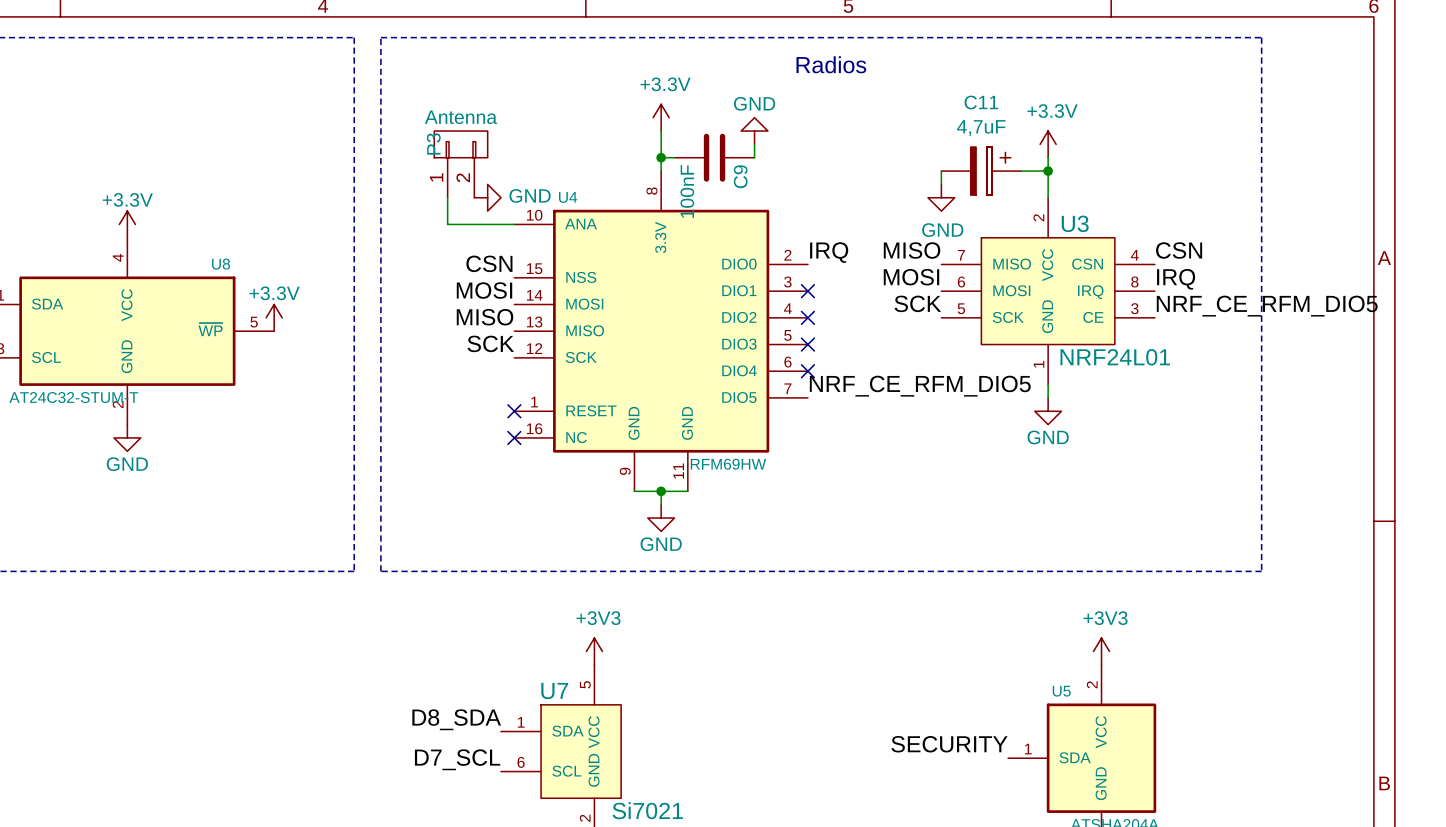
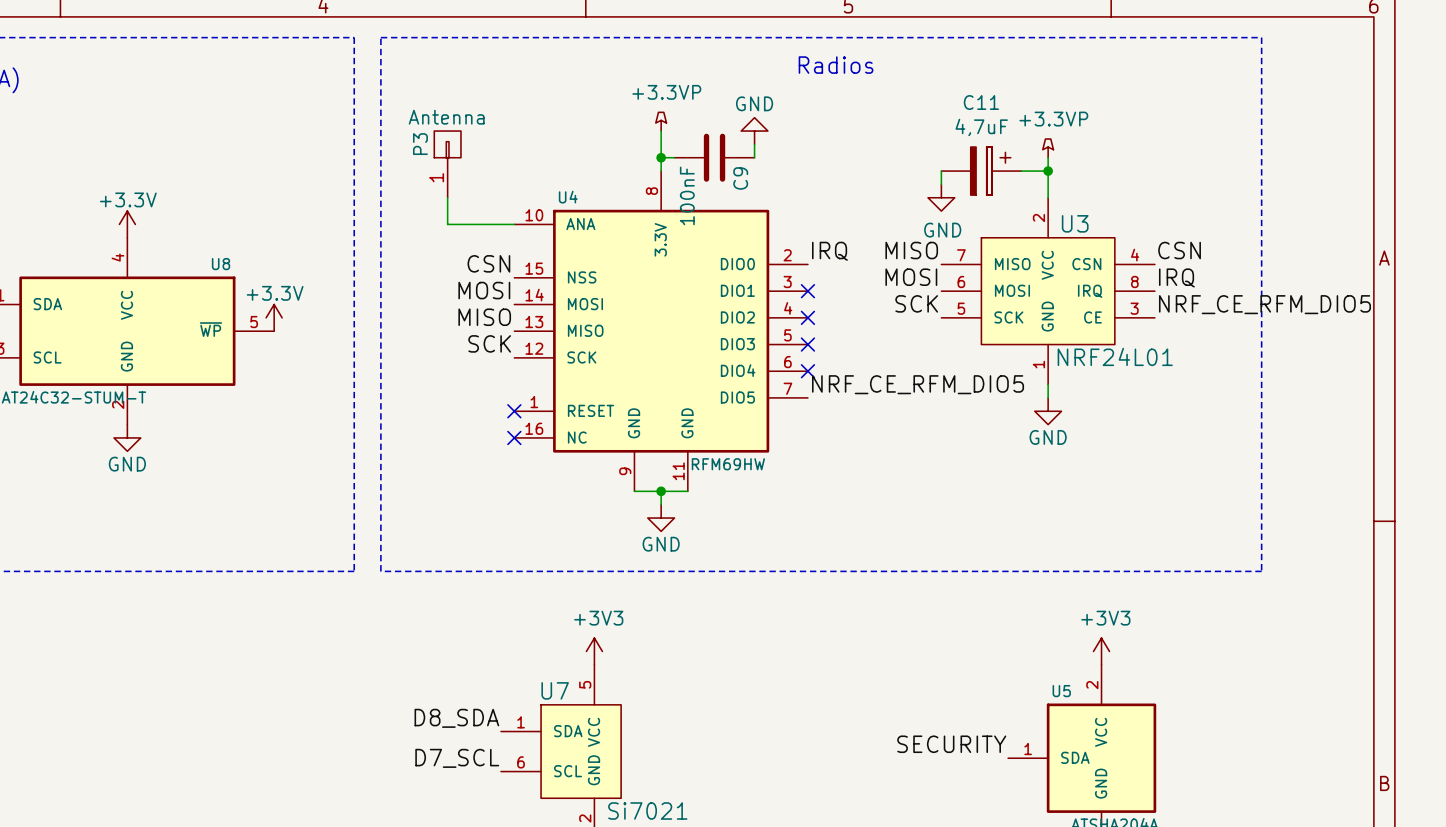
power symbol: +3.3V (661, 117) -> +3.3VP (661, 121)
P3 symbol: [434, 131, 488, 198] -> [434, 131, 461, 198]
power symbol: +3.3V (1048, 144) -> +3.3VP (1048, 148)
power symbol: GND (487, 197) -> none

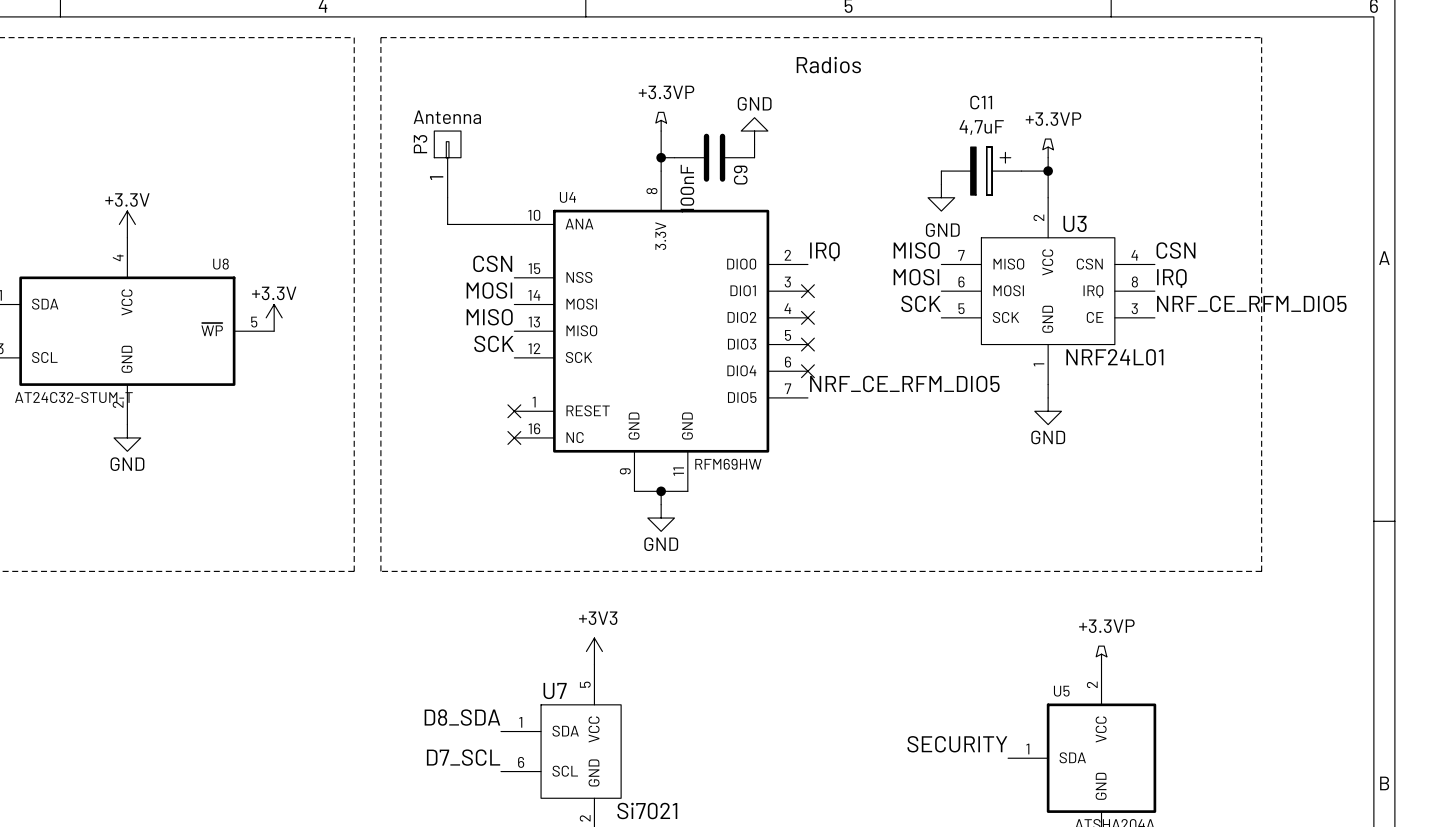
power symbol: +3V3 (1101, 651) -> +3.3VP (1101, 655)

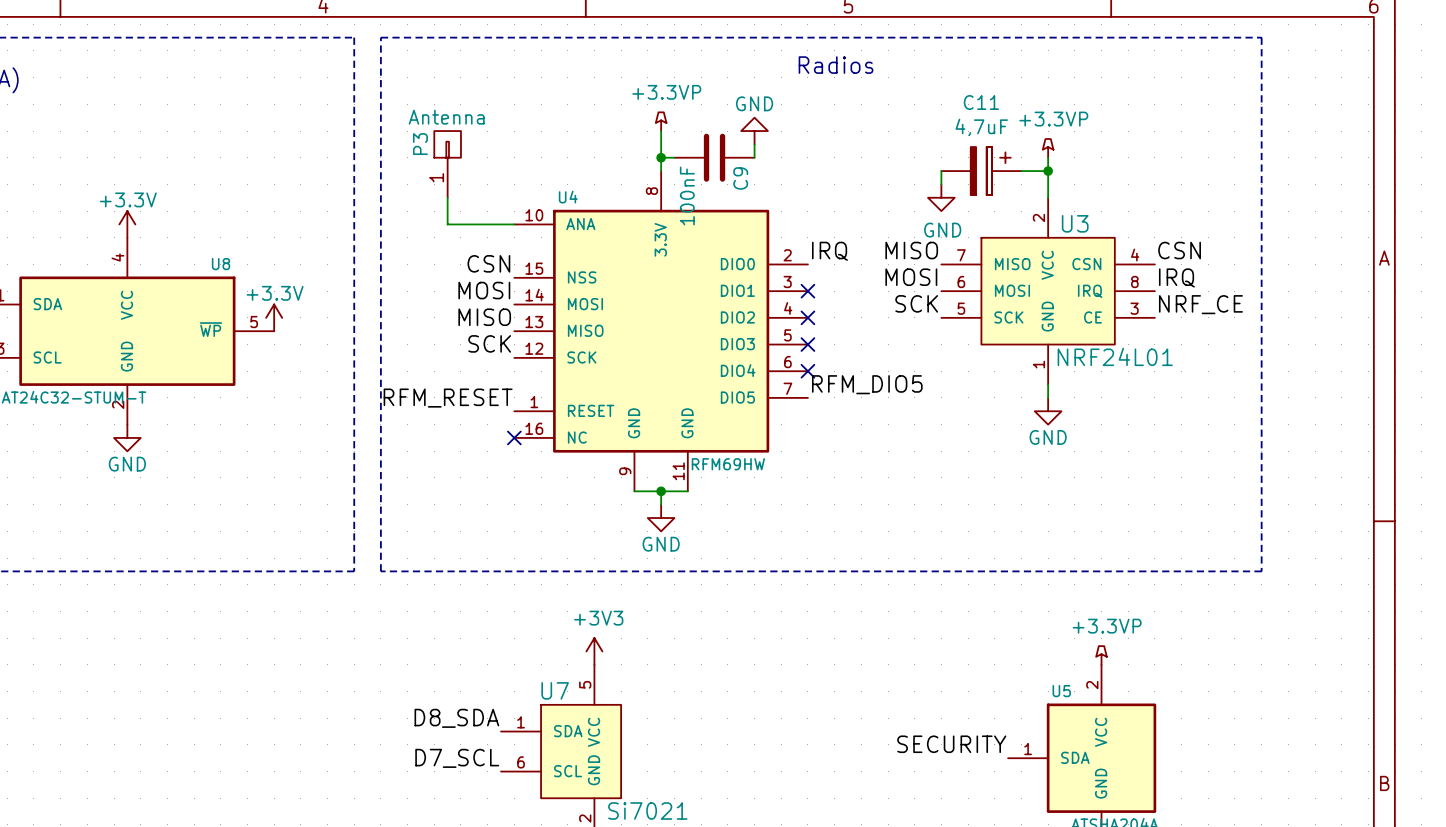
label: NRF_CE_RFM_DIO5 (1251, 303) -> NRF_CE (1200, 304)
label: NRF_CE_RFM_DIO5 (904, 383) -> RFM_DIO5 (867, 384)
label: none -> RFM_RESET (448, 398)
no-connect mark: (514, 411) -> none

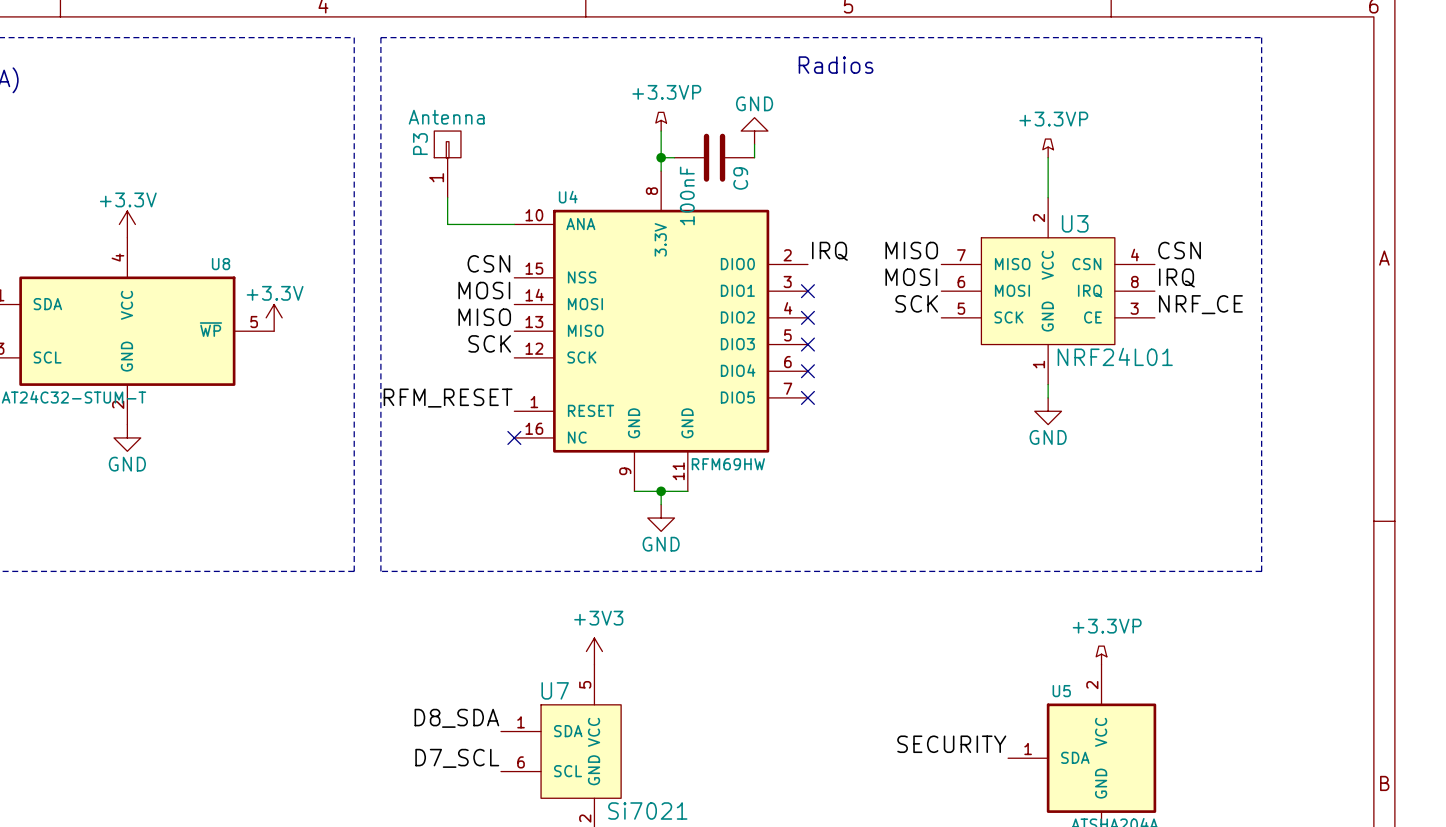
wire: (941, 171) (941, 184) -> none
C11: 4,7uF (981, 171) -> none
wire: (1021, 171) (1048, 171) -> none
junction: (1048, 171) -> none
power symbol: GND (941, 197) -> none
label: RFM_DIO5 (867, 384) -> none
no-connect mark: none -> (807, 397)

